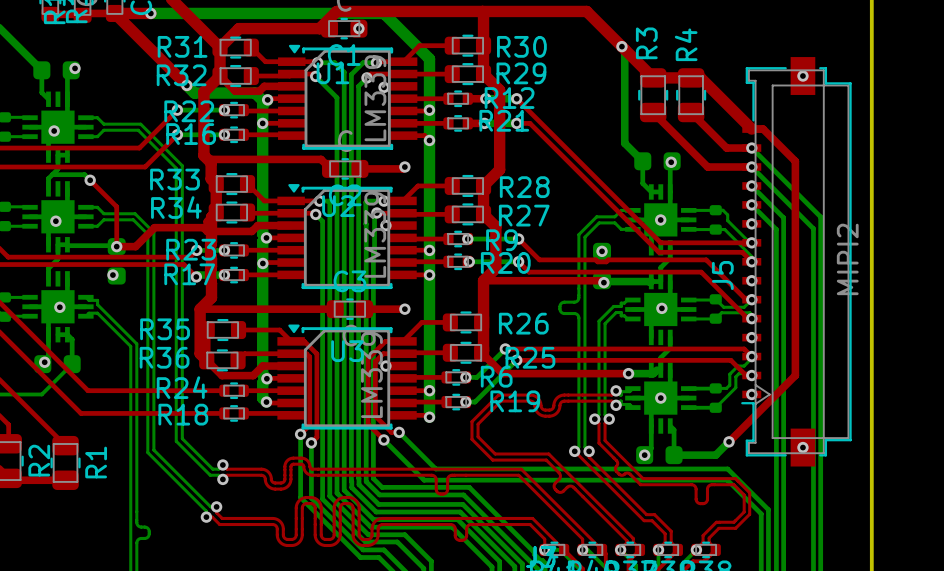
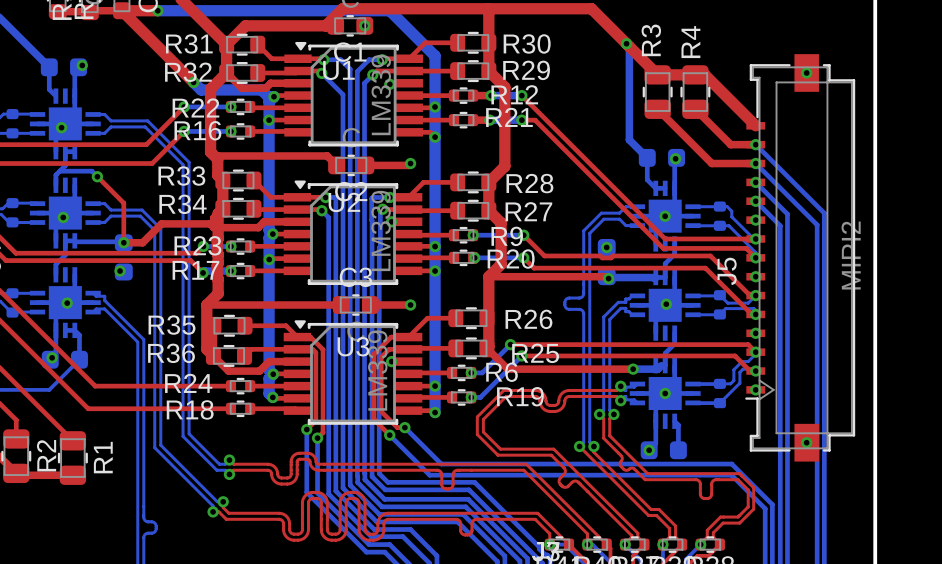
top track: (751, 129) (763, 129) (795, 161) (795, 375) (729, 441) -> none
bottom track: (729, 441) (715, 455) (674, 455) -> none
via: (729, 441) -> none

